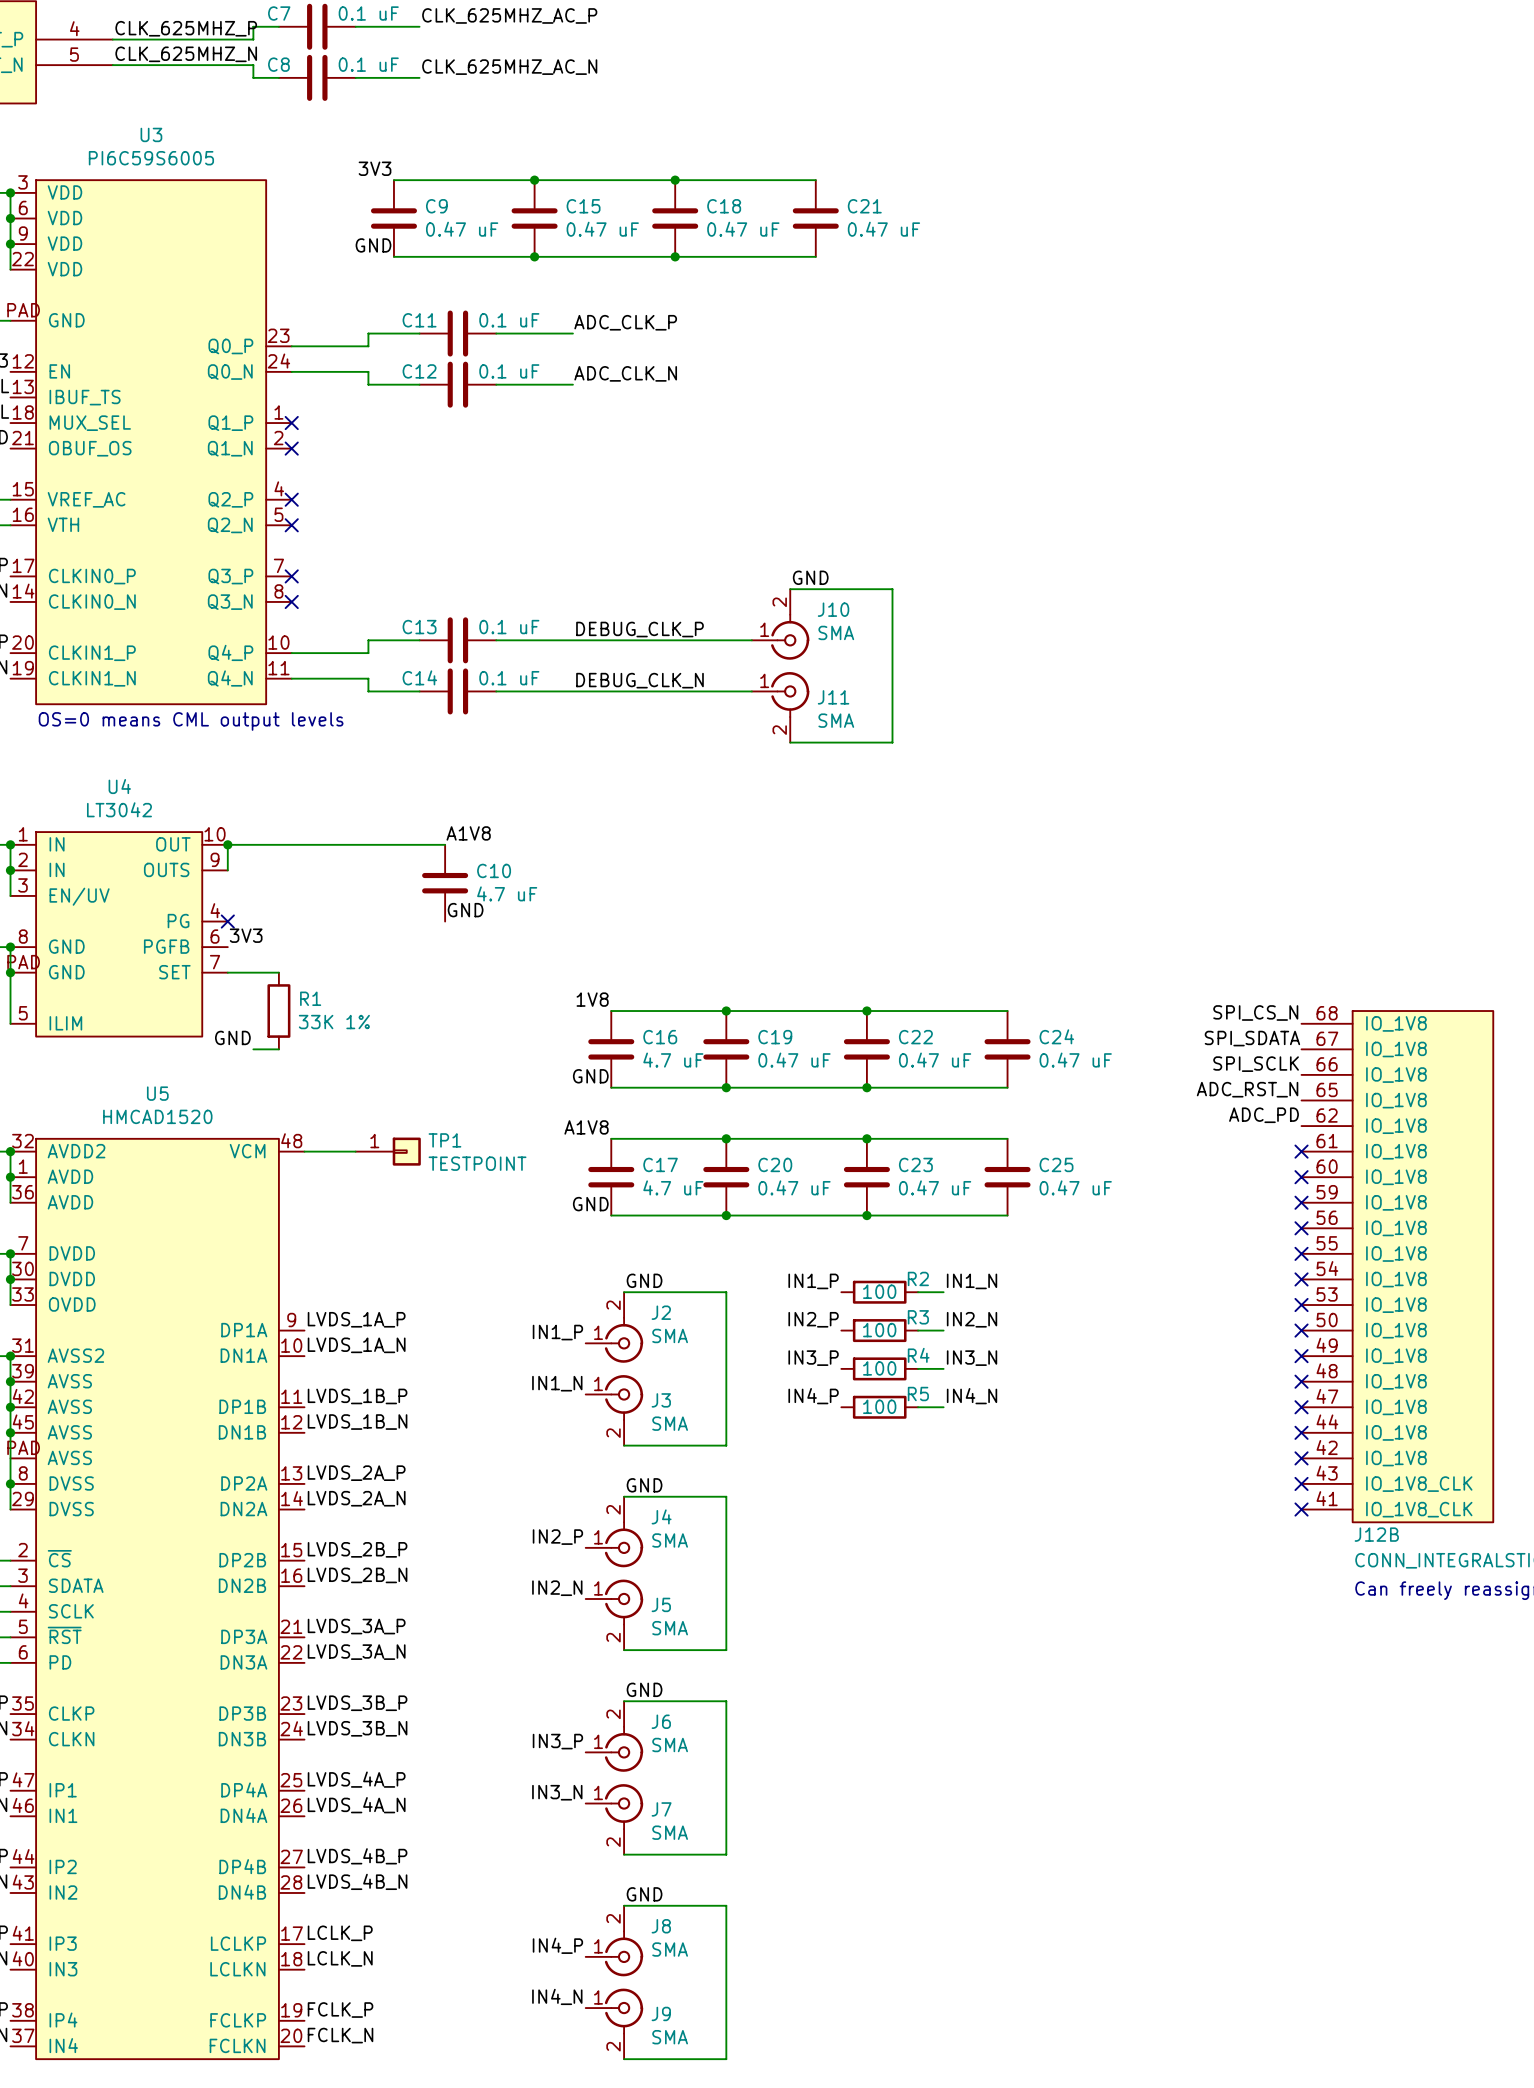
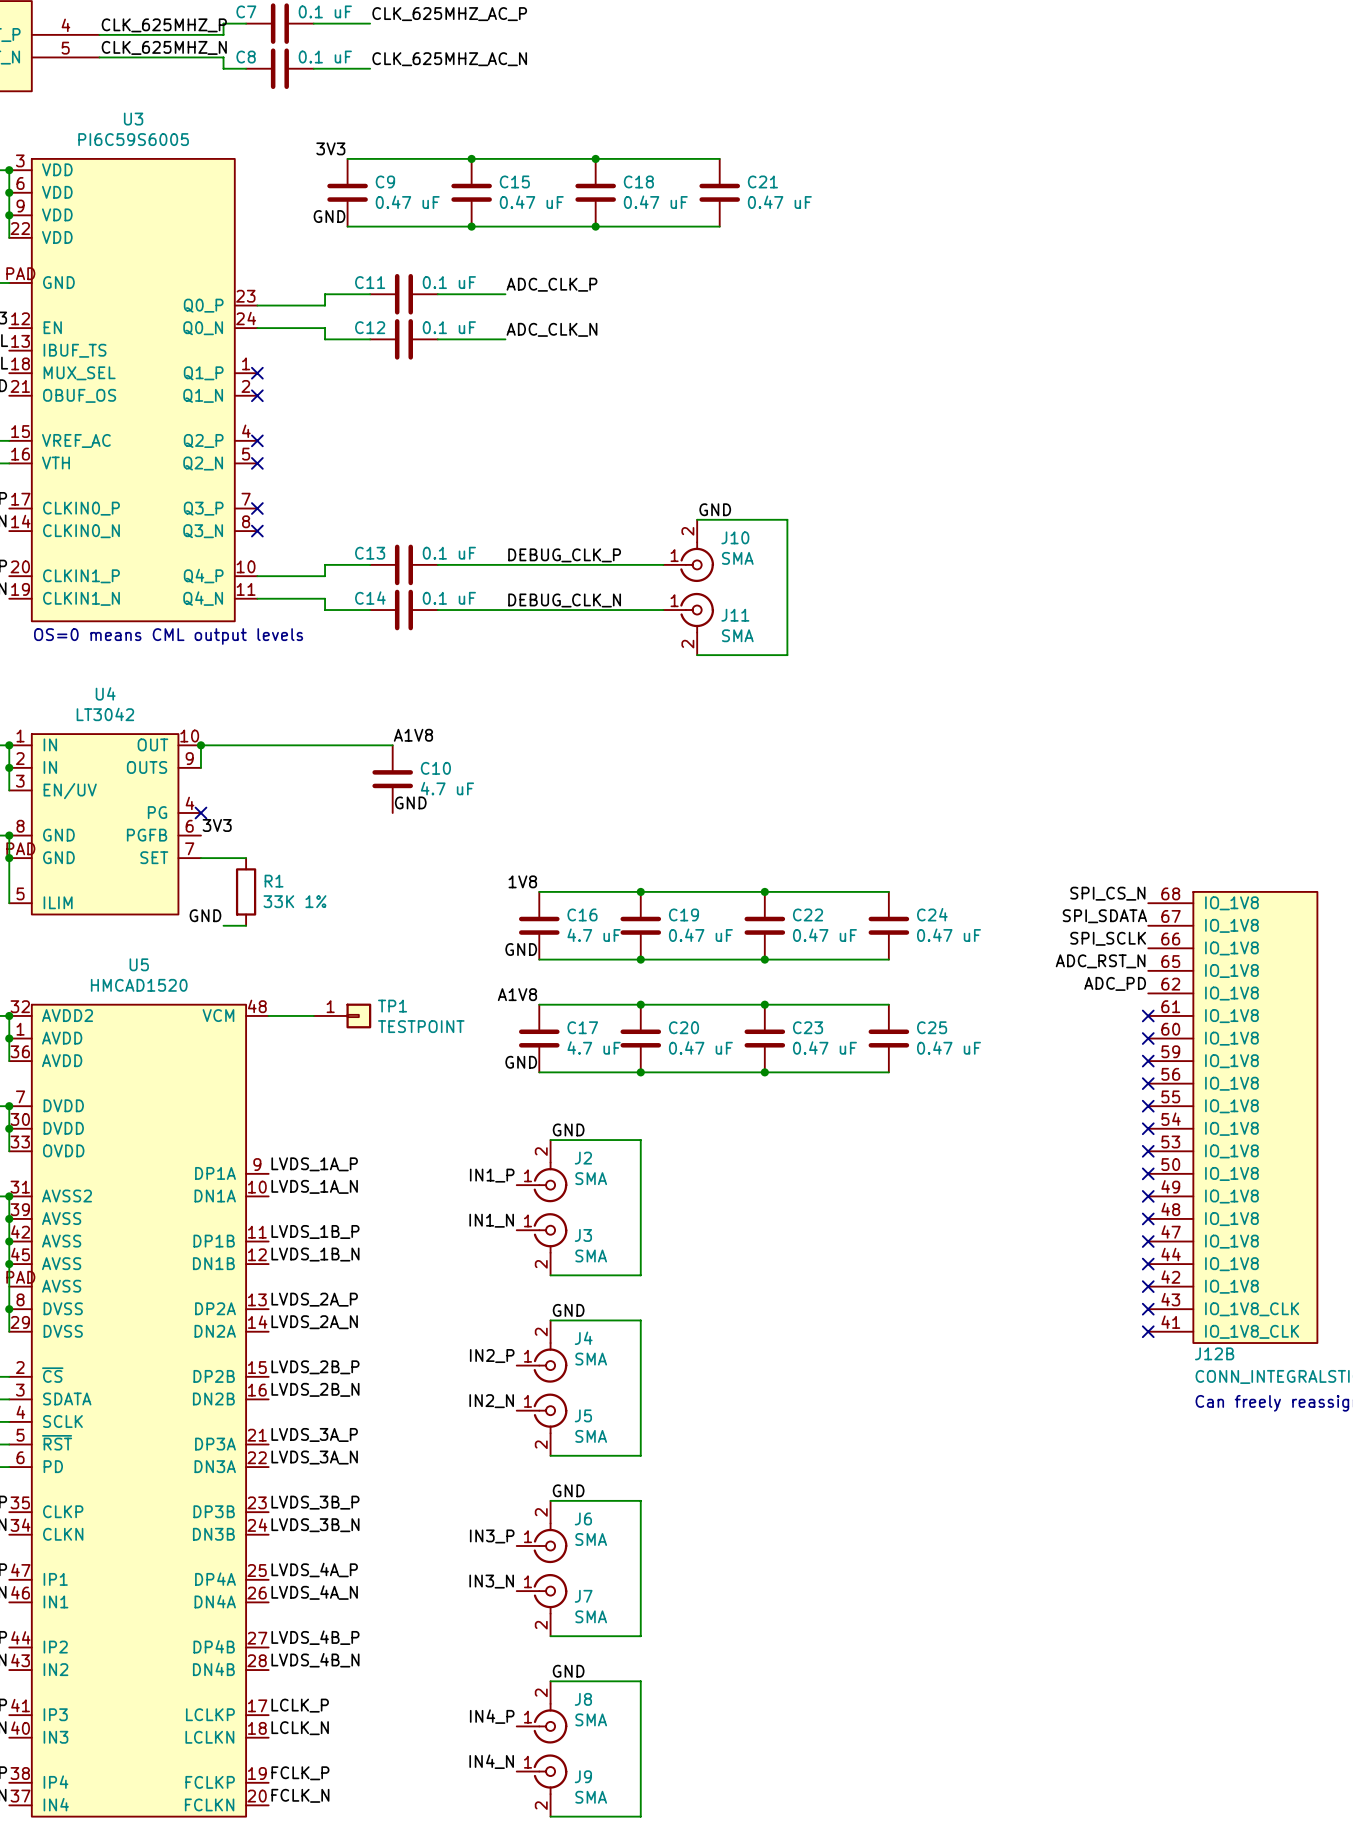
label: IN1_P (813, 1281) -> none
label: IN1_N (972, 1281) -> none
R2: 100 (879, 1292) -> none
wire: (918, 1292) (943, 1292) -> none
label: IN2_P (813, 1319) -> none
label: IN2_N (972, 1319) -> none
R3: 100 (879, 1330) -> none
wire: (918, 1330) (943, 1330) -> none
label: IN3_P (813, 1358) -> none
label: IN3_N (972, 1358) -> none
R4: 100 (879, 1368) -> none
wire: (918, 1368) (943, 1368) -> none
label: IN4_P (813, 1396) -> none
label: IN4_N (972, 1396) -> none
R5: 100 (879, 1407) -> none
wire: (918, 1407) (943, 1407) -> none

